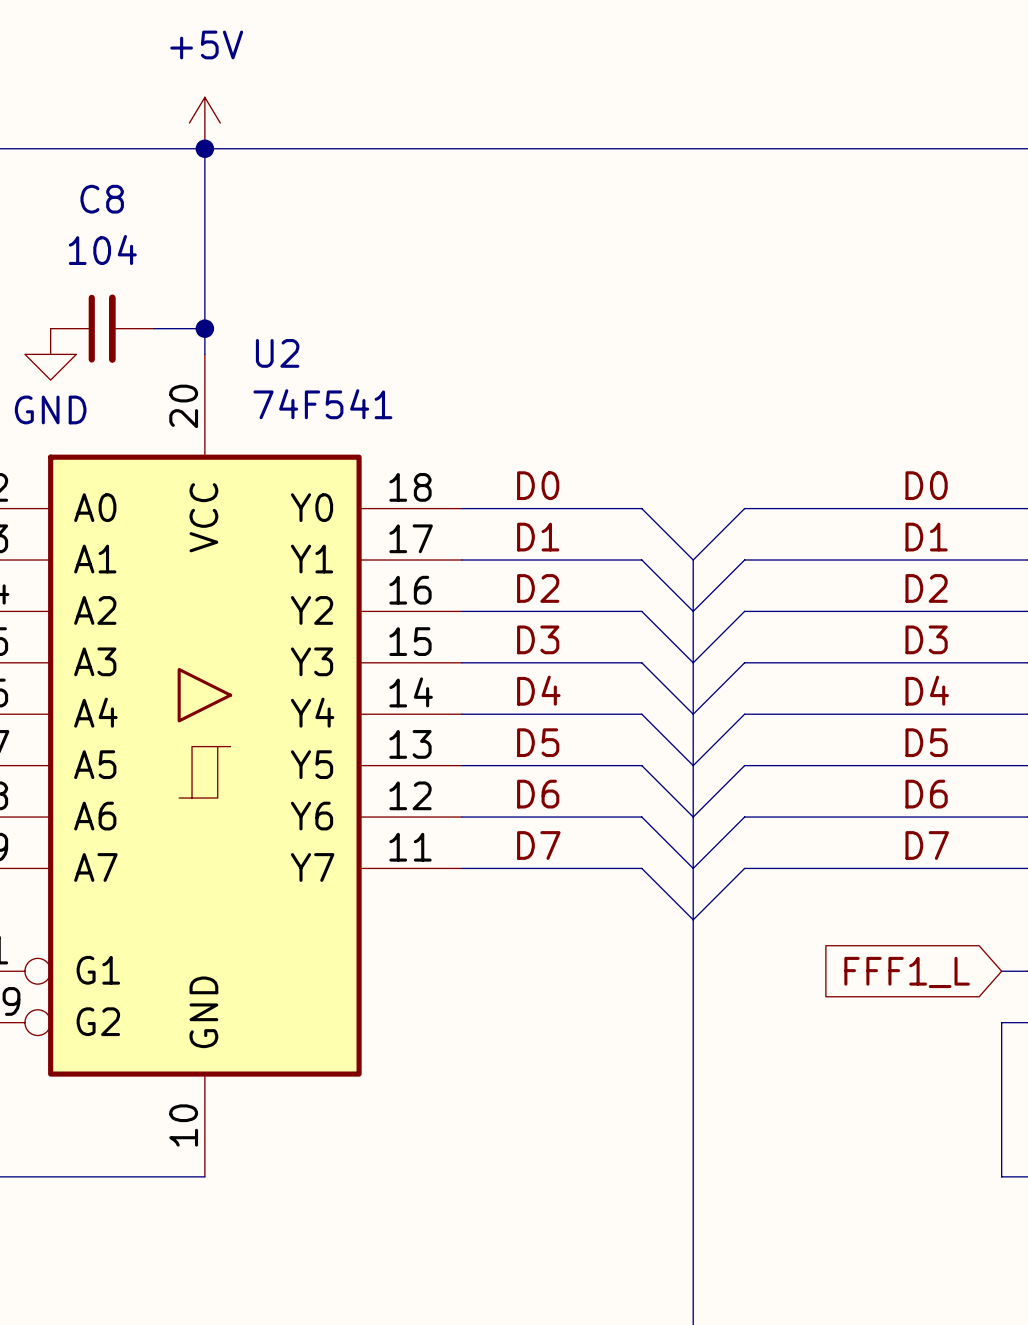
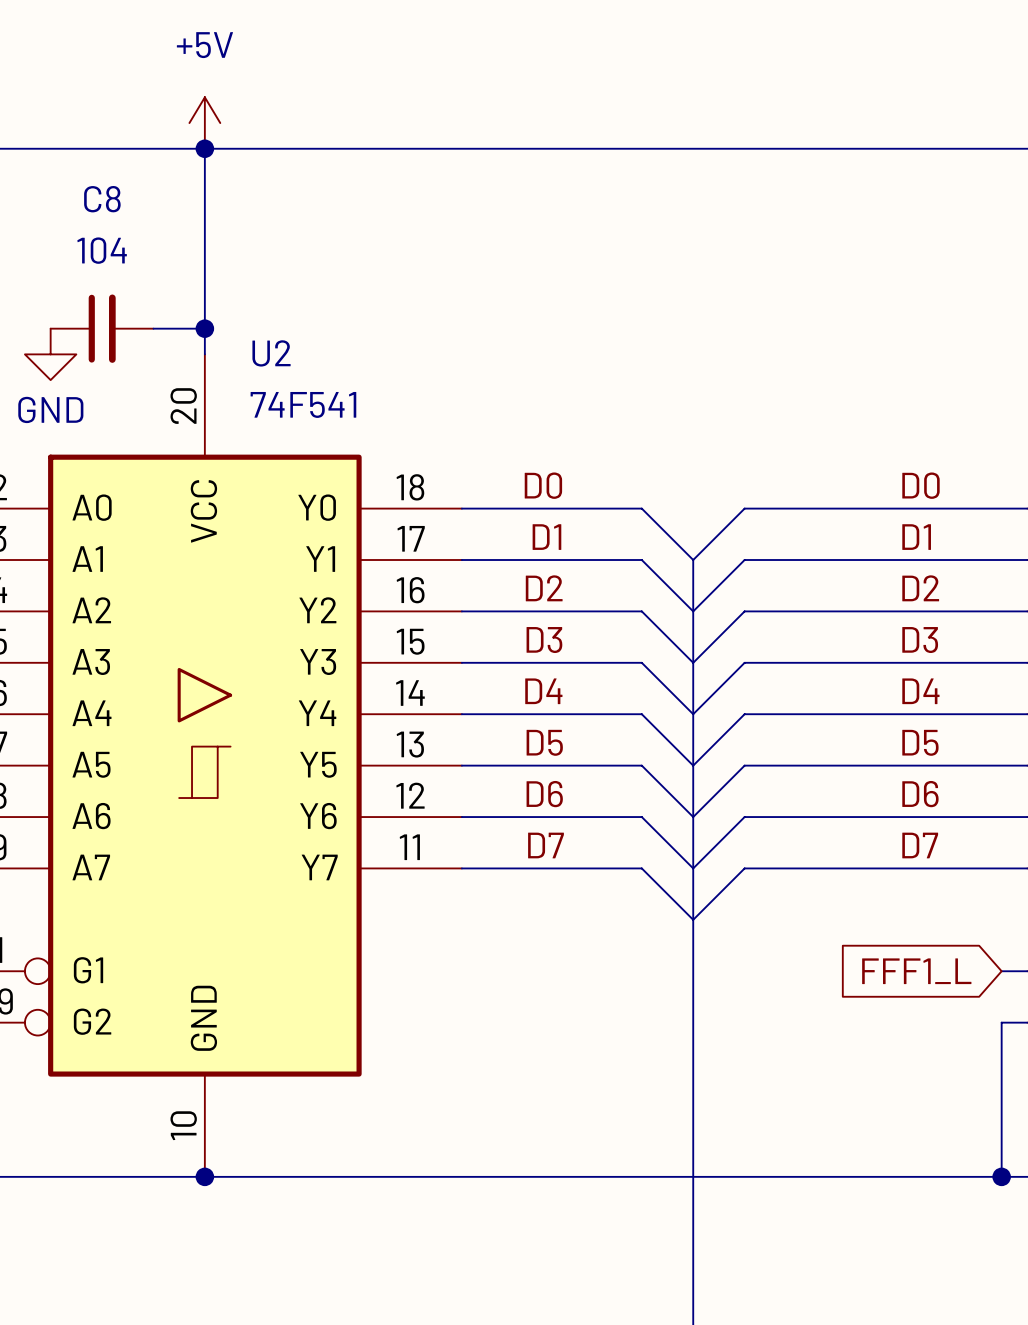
wire: none -> (204, 1176) (1001, 1176)
junction: none -> (204, 1176)
junction: none -> (1001, 1176)

